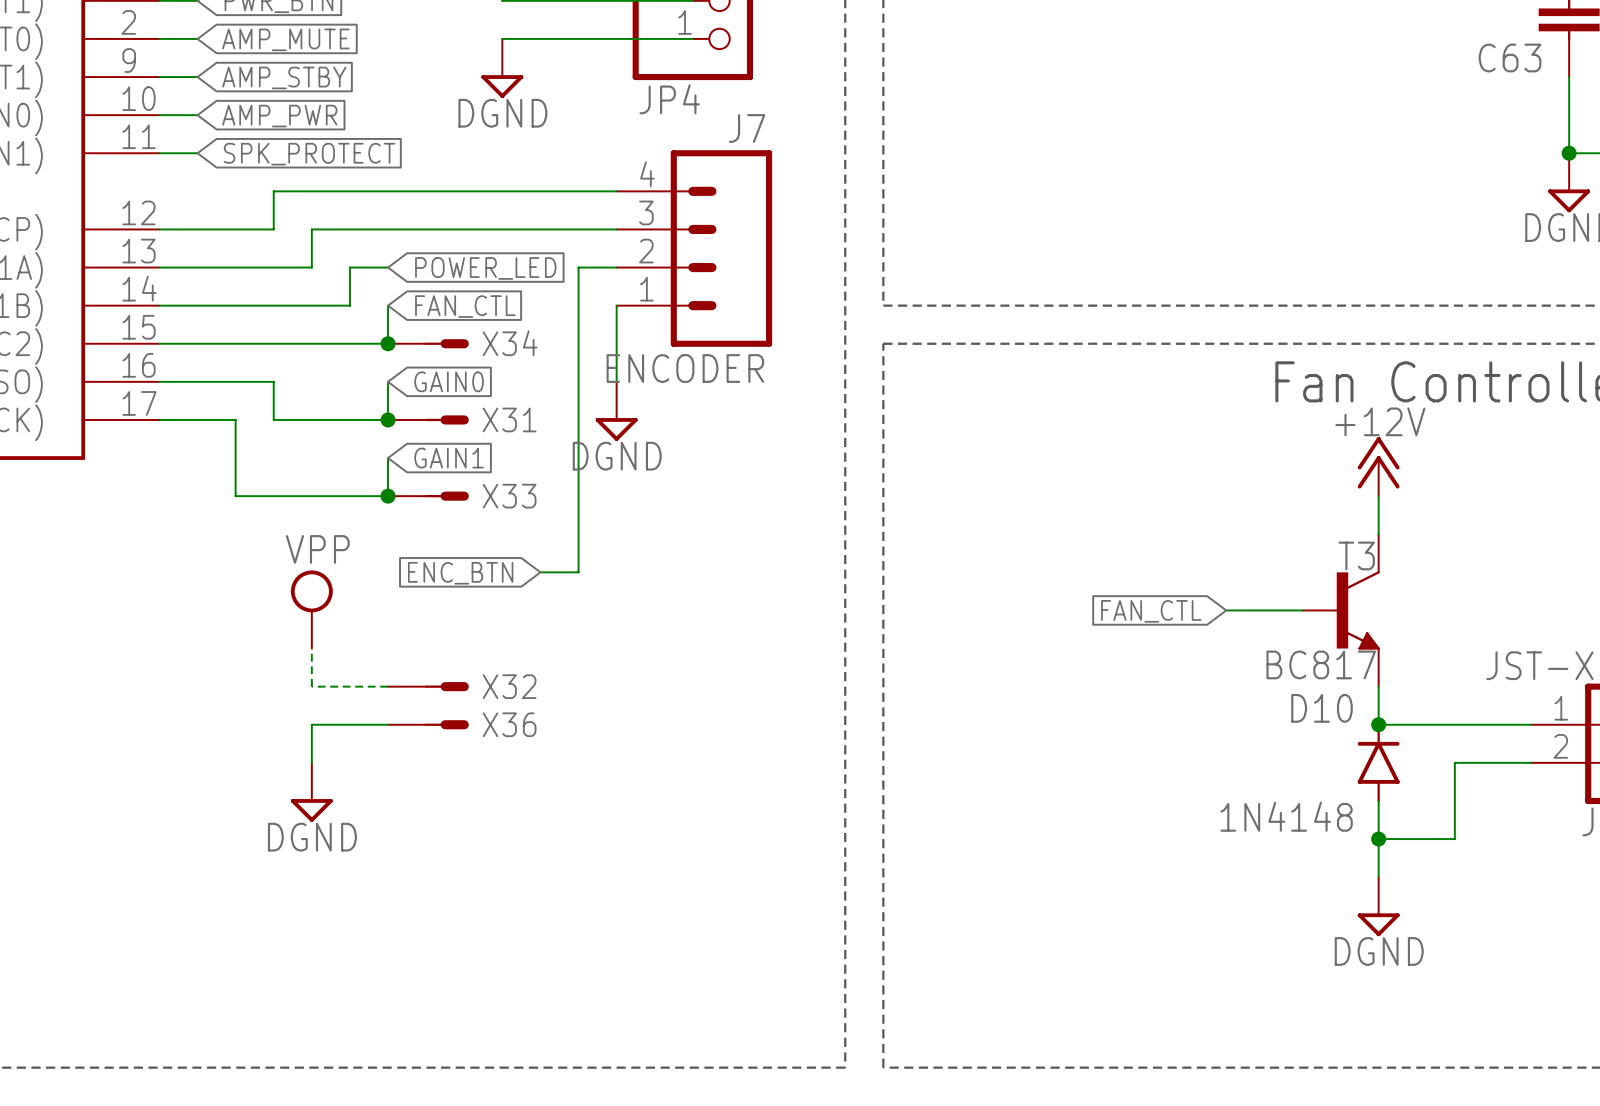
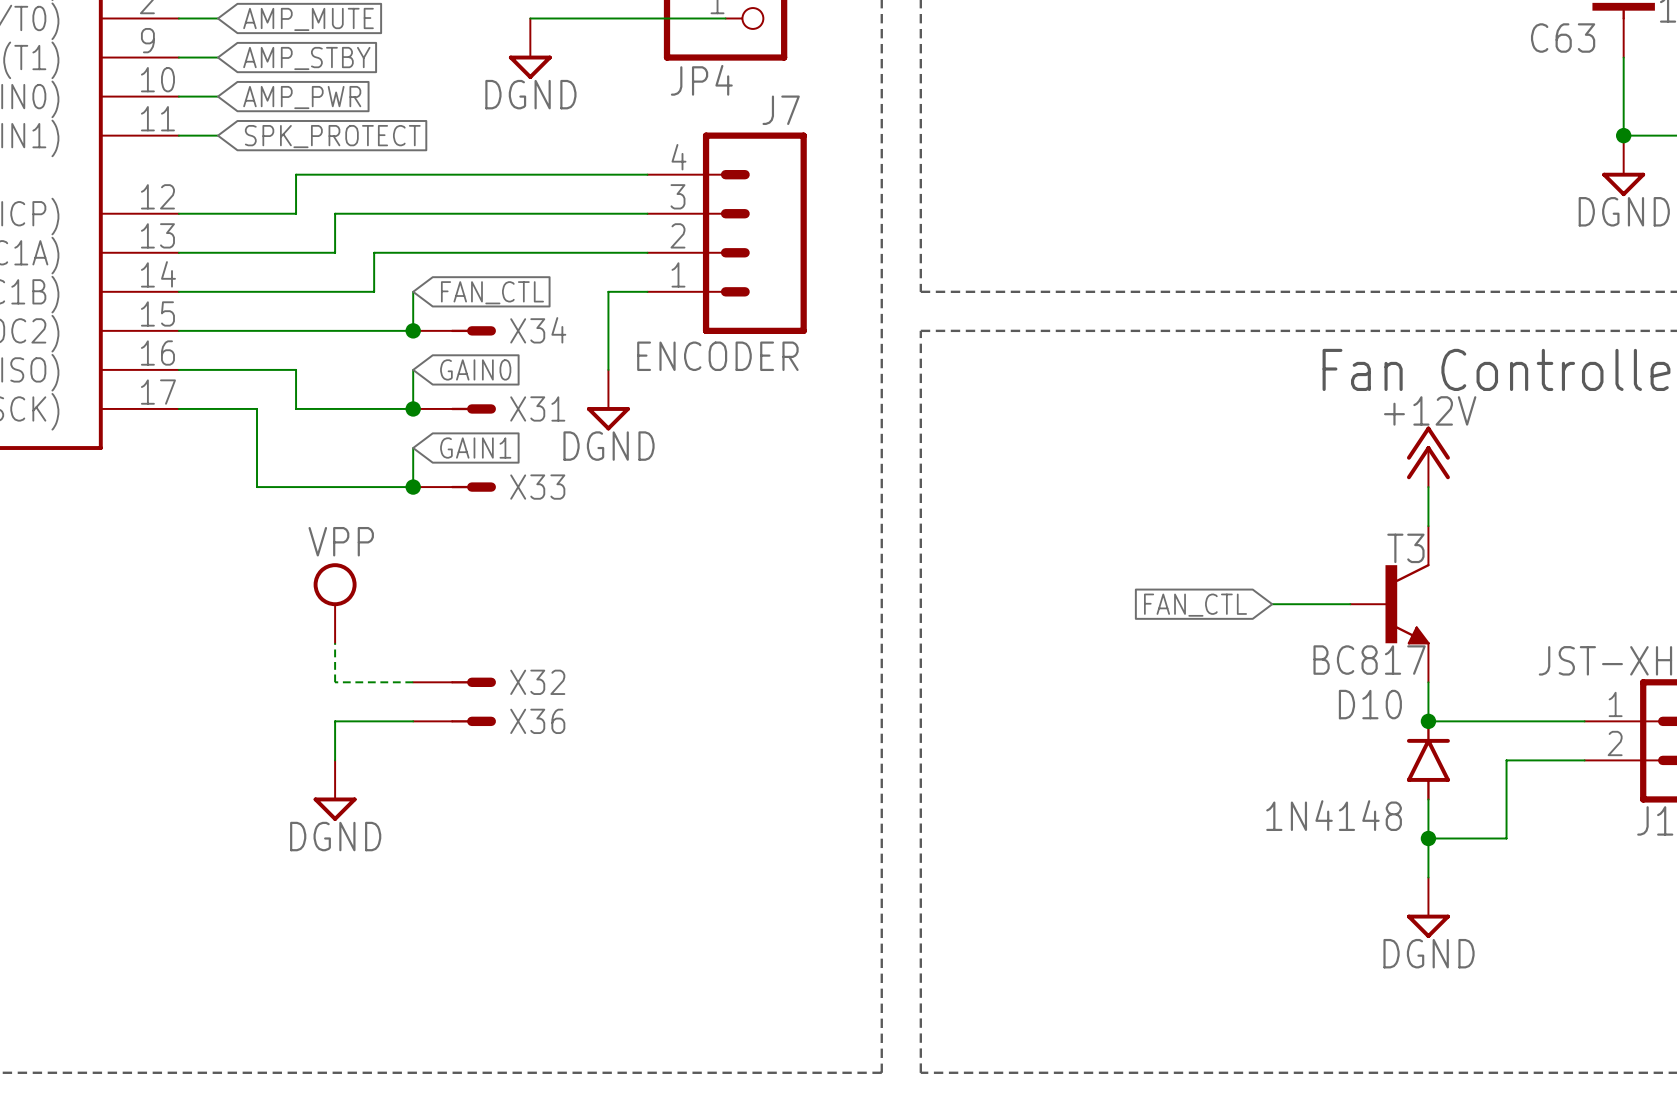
wire: none -> (413, 252) (608, 252)
wire: (578, 267) (578, 305) -> (647, 291) (608, 291)
global label: POWER_LED (485, 268) -> none
wire: (616, 305) (616, 381) -> none
wire: (578, 381) (578, 572) (540, 572) -> none
power symbol position: DGND (616, 411) -> DGND (608, 400)
global label: ENC_BTN (460, 573) -> none

